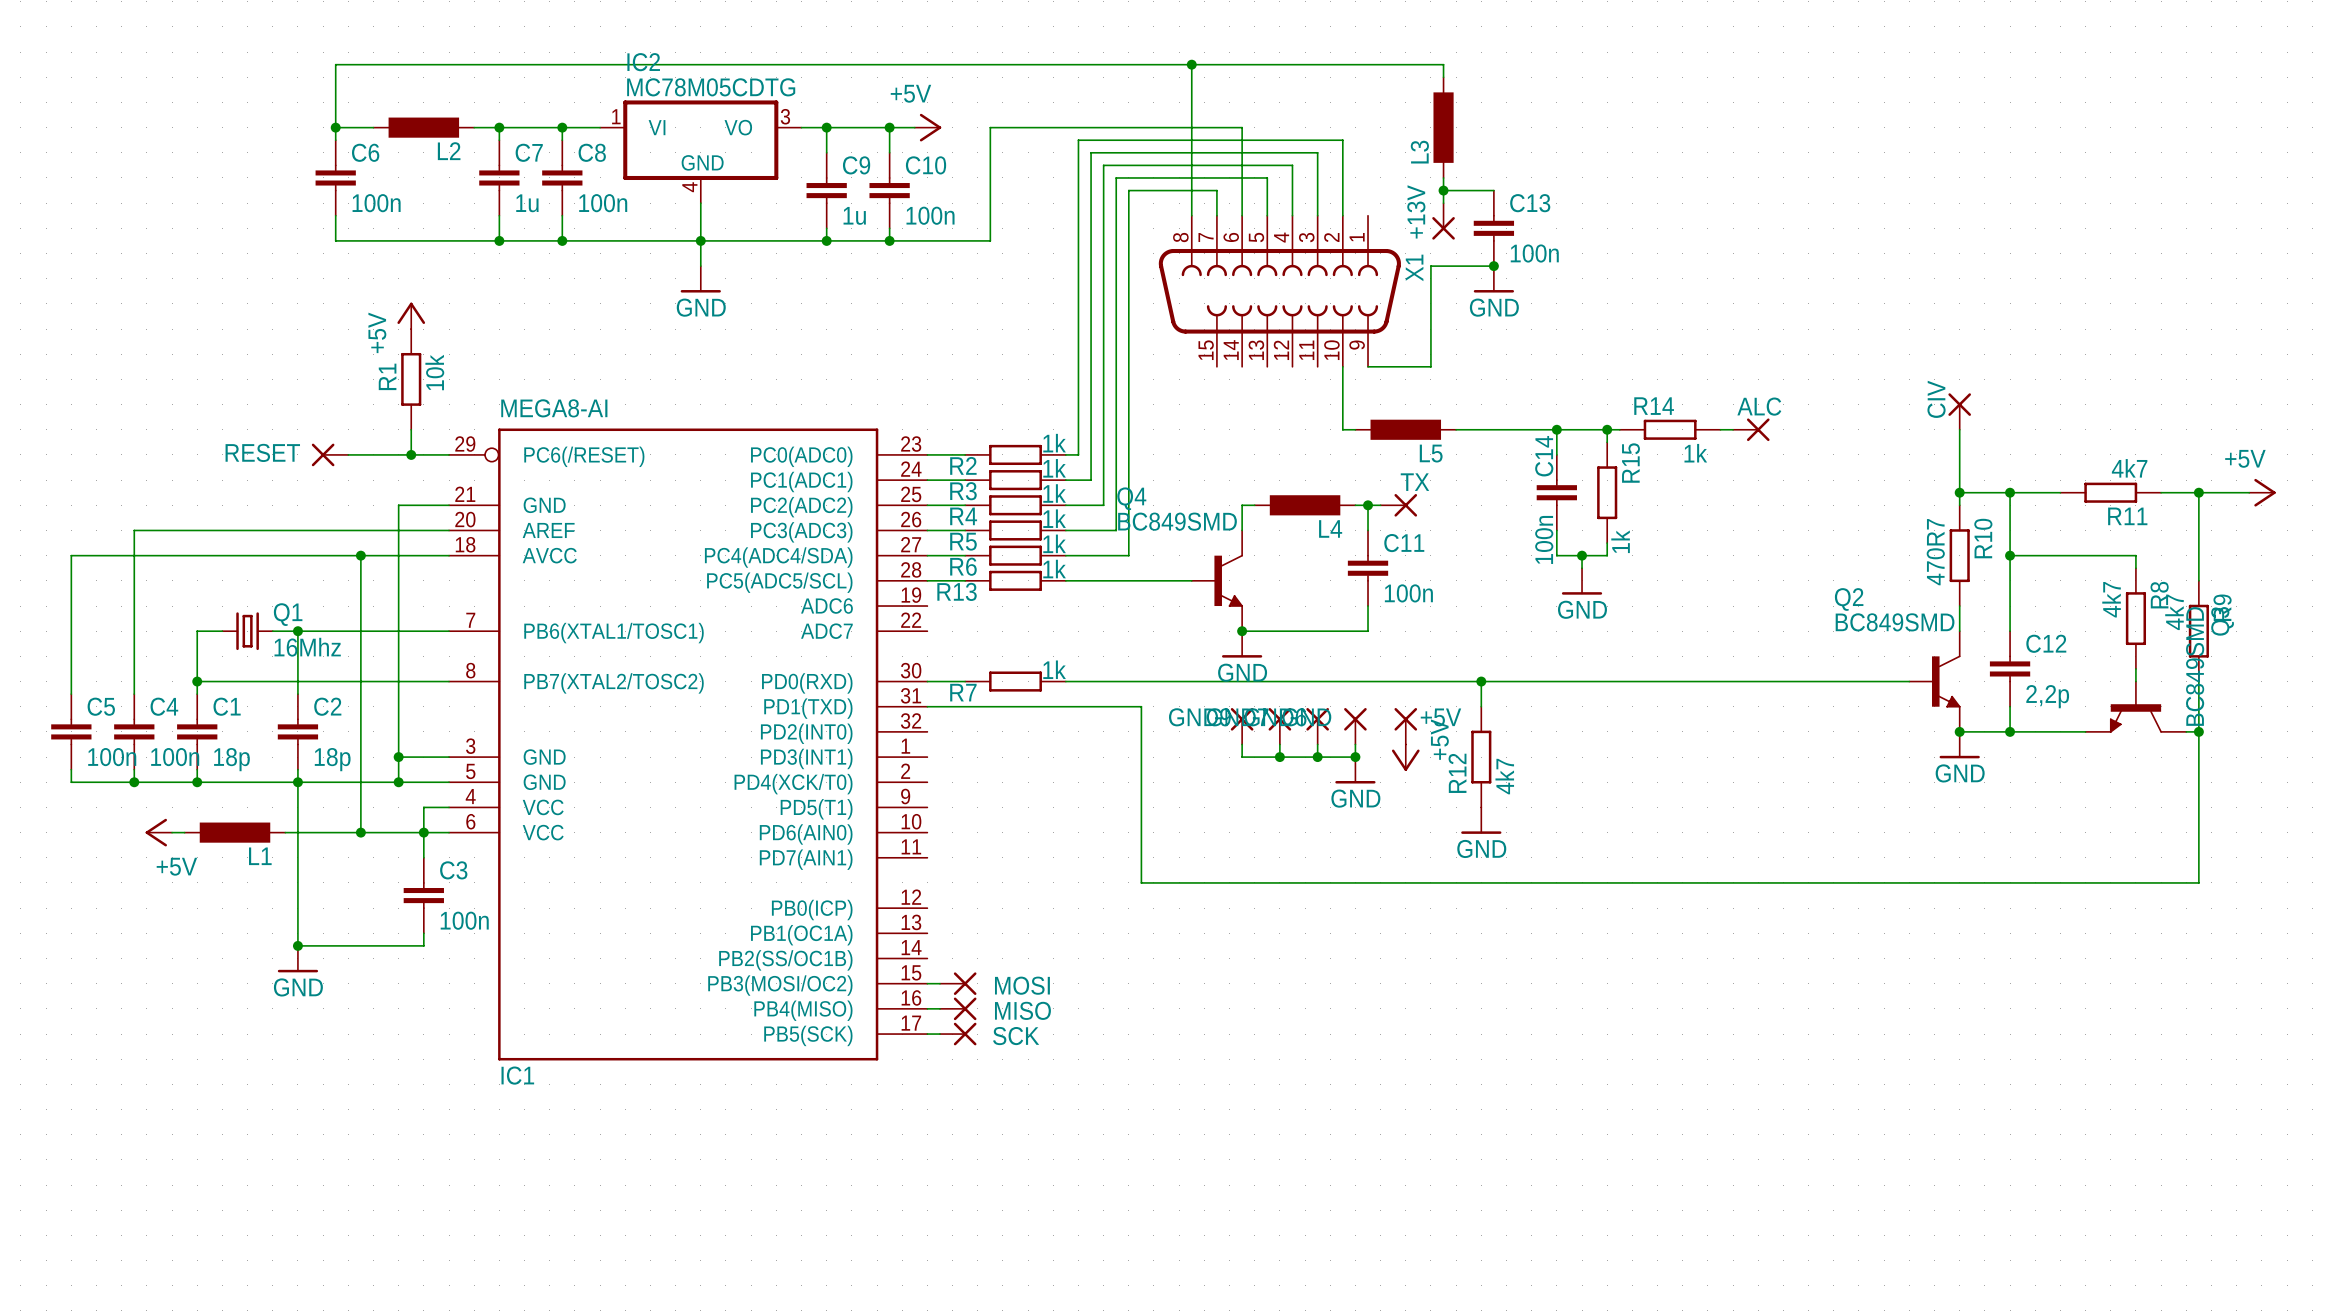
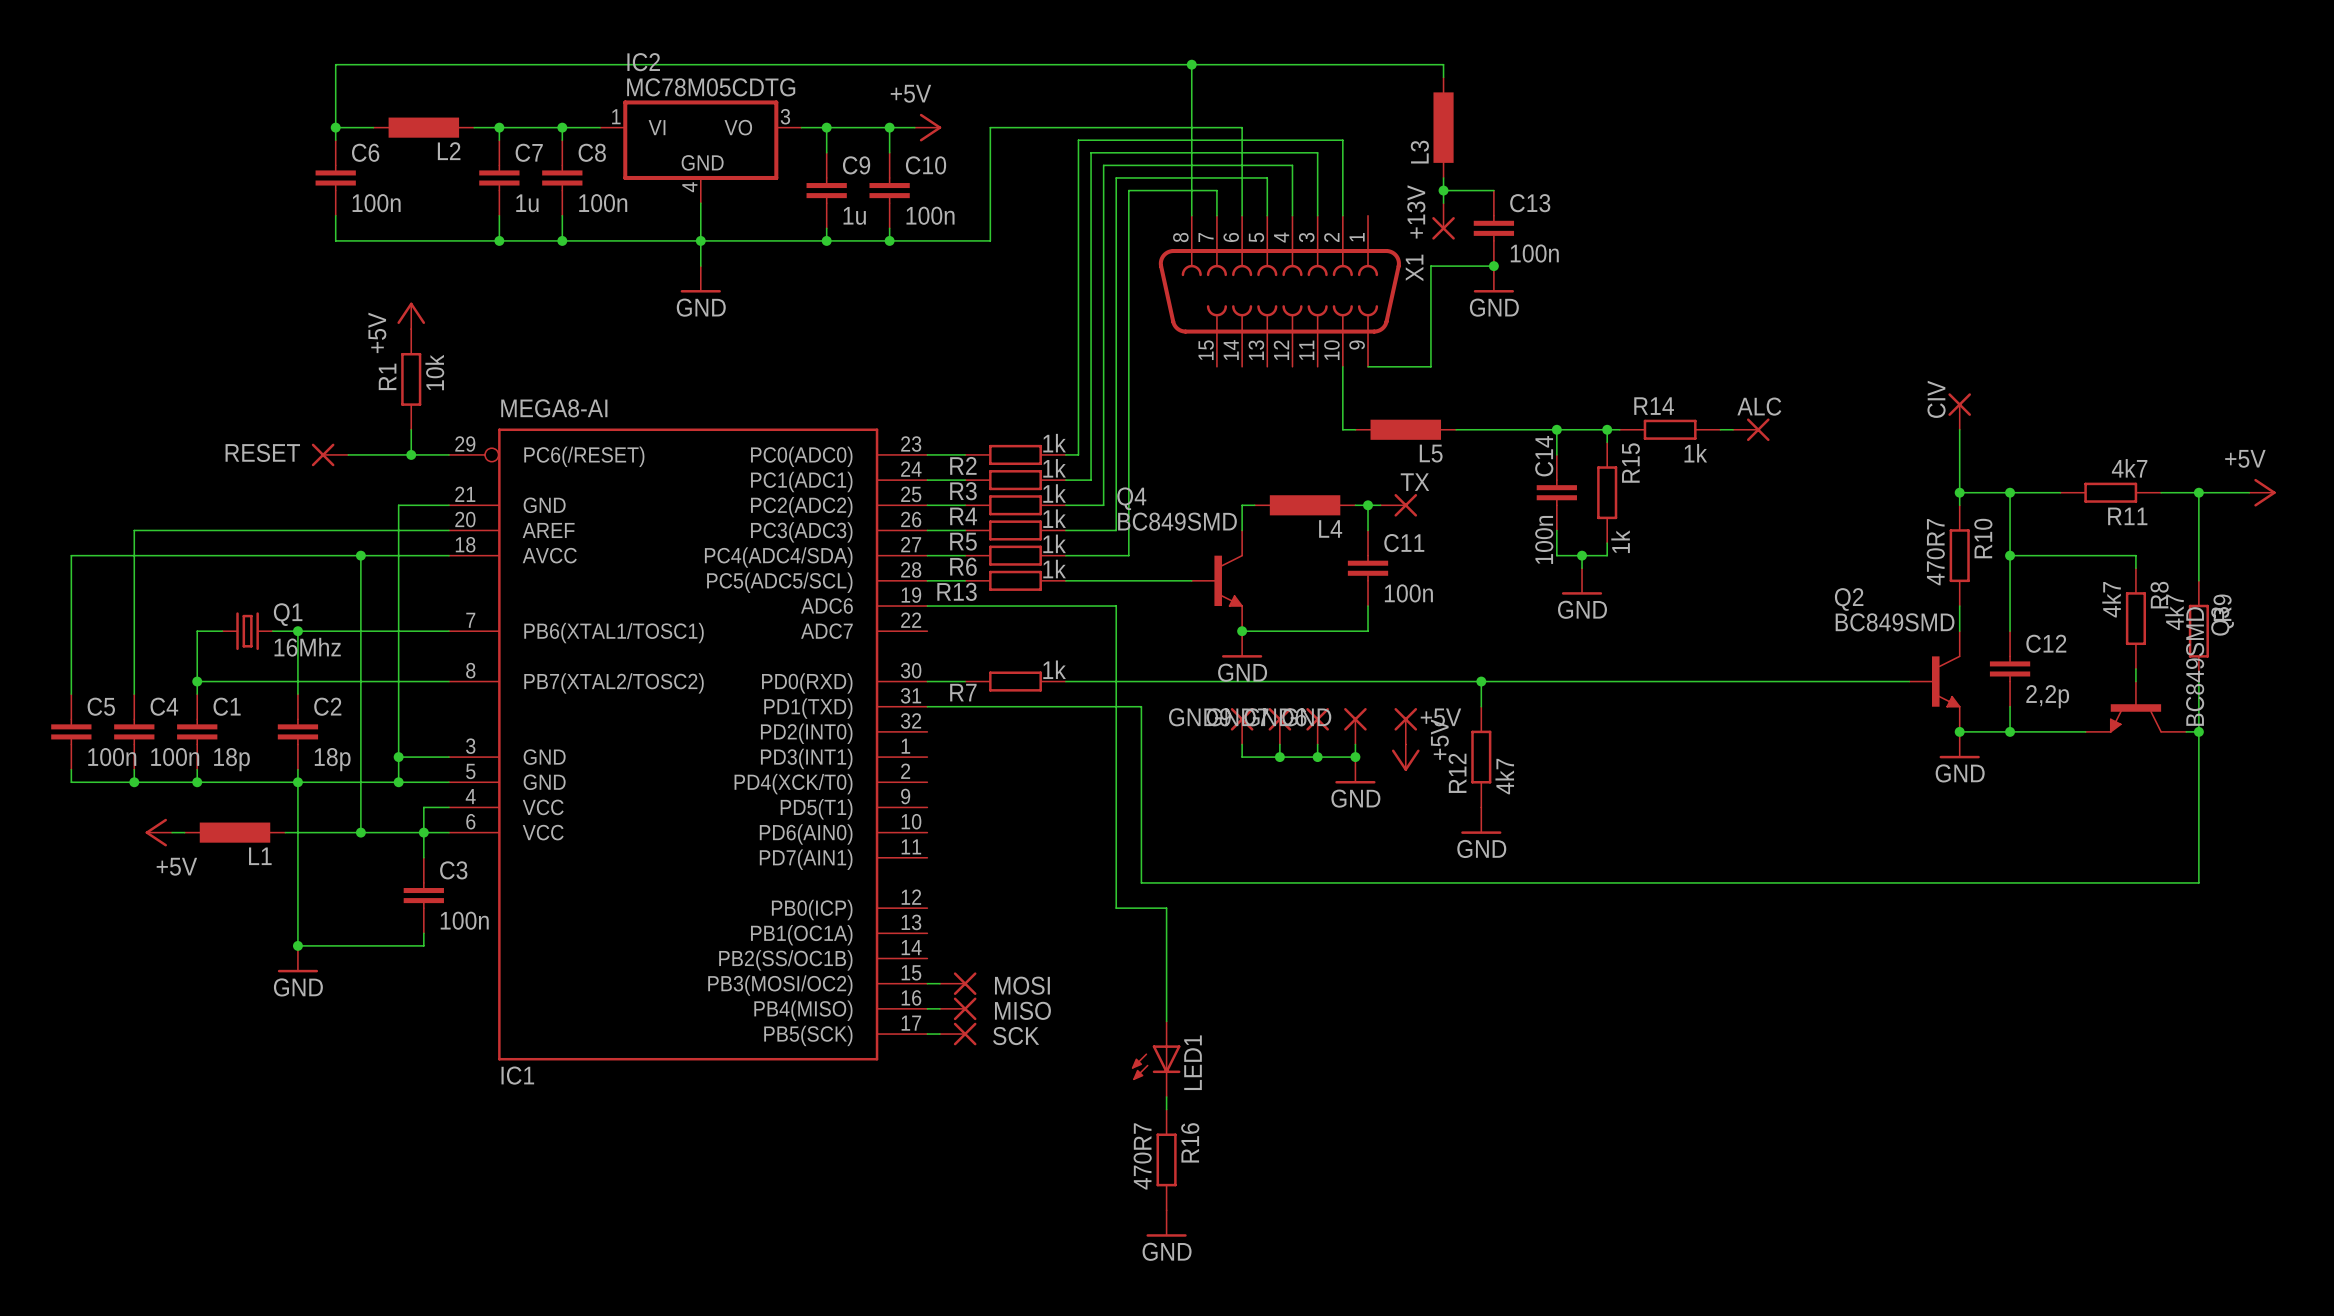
wire: none -> (927, 606) (1116, 606) (1116, 908) (1166, 908) (1166, 1021)
LED1: none -> (1156, 1059)
wire: none -> (1166, 1096) (1166, 1109)
R16: none -> 470R7 (1166, 1159)
power symbol: none -> GND (1166, 1223)

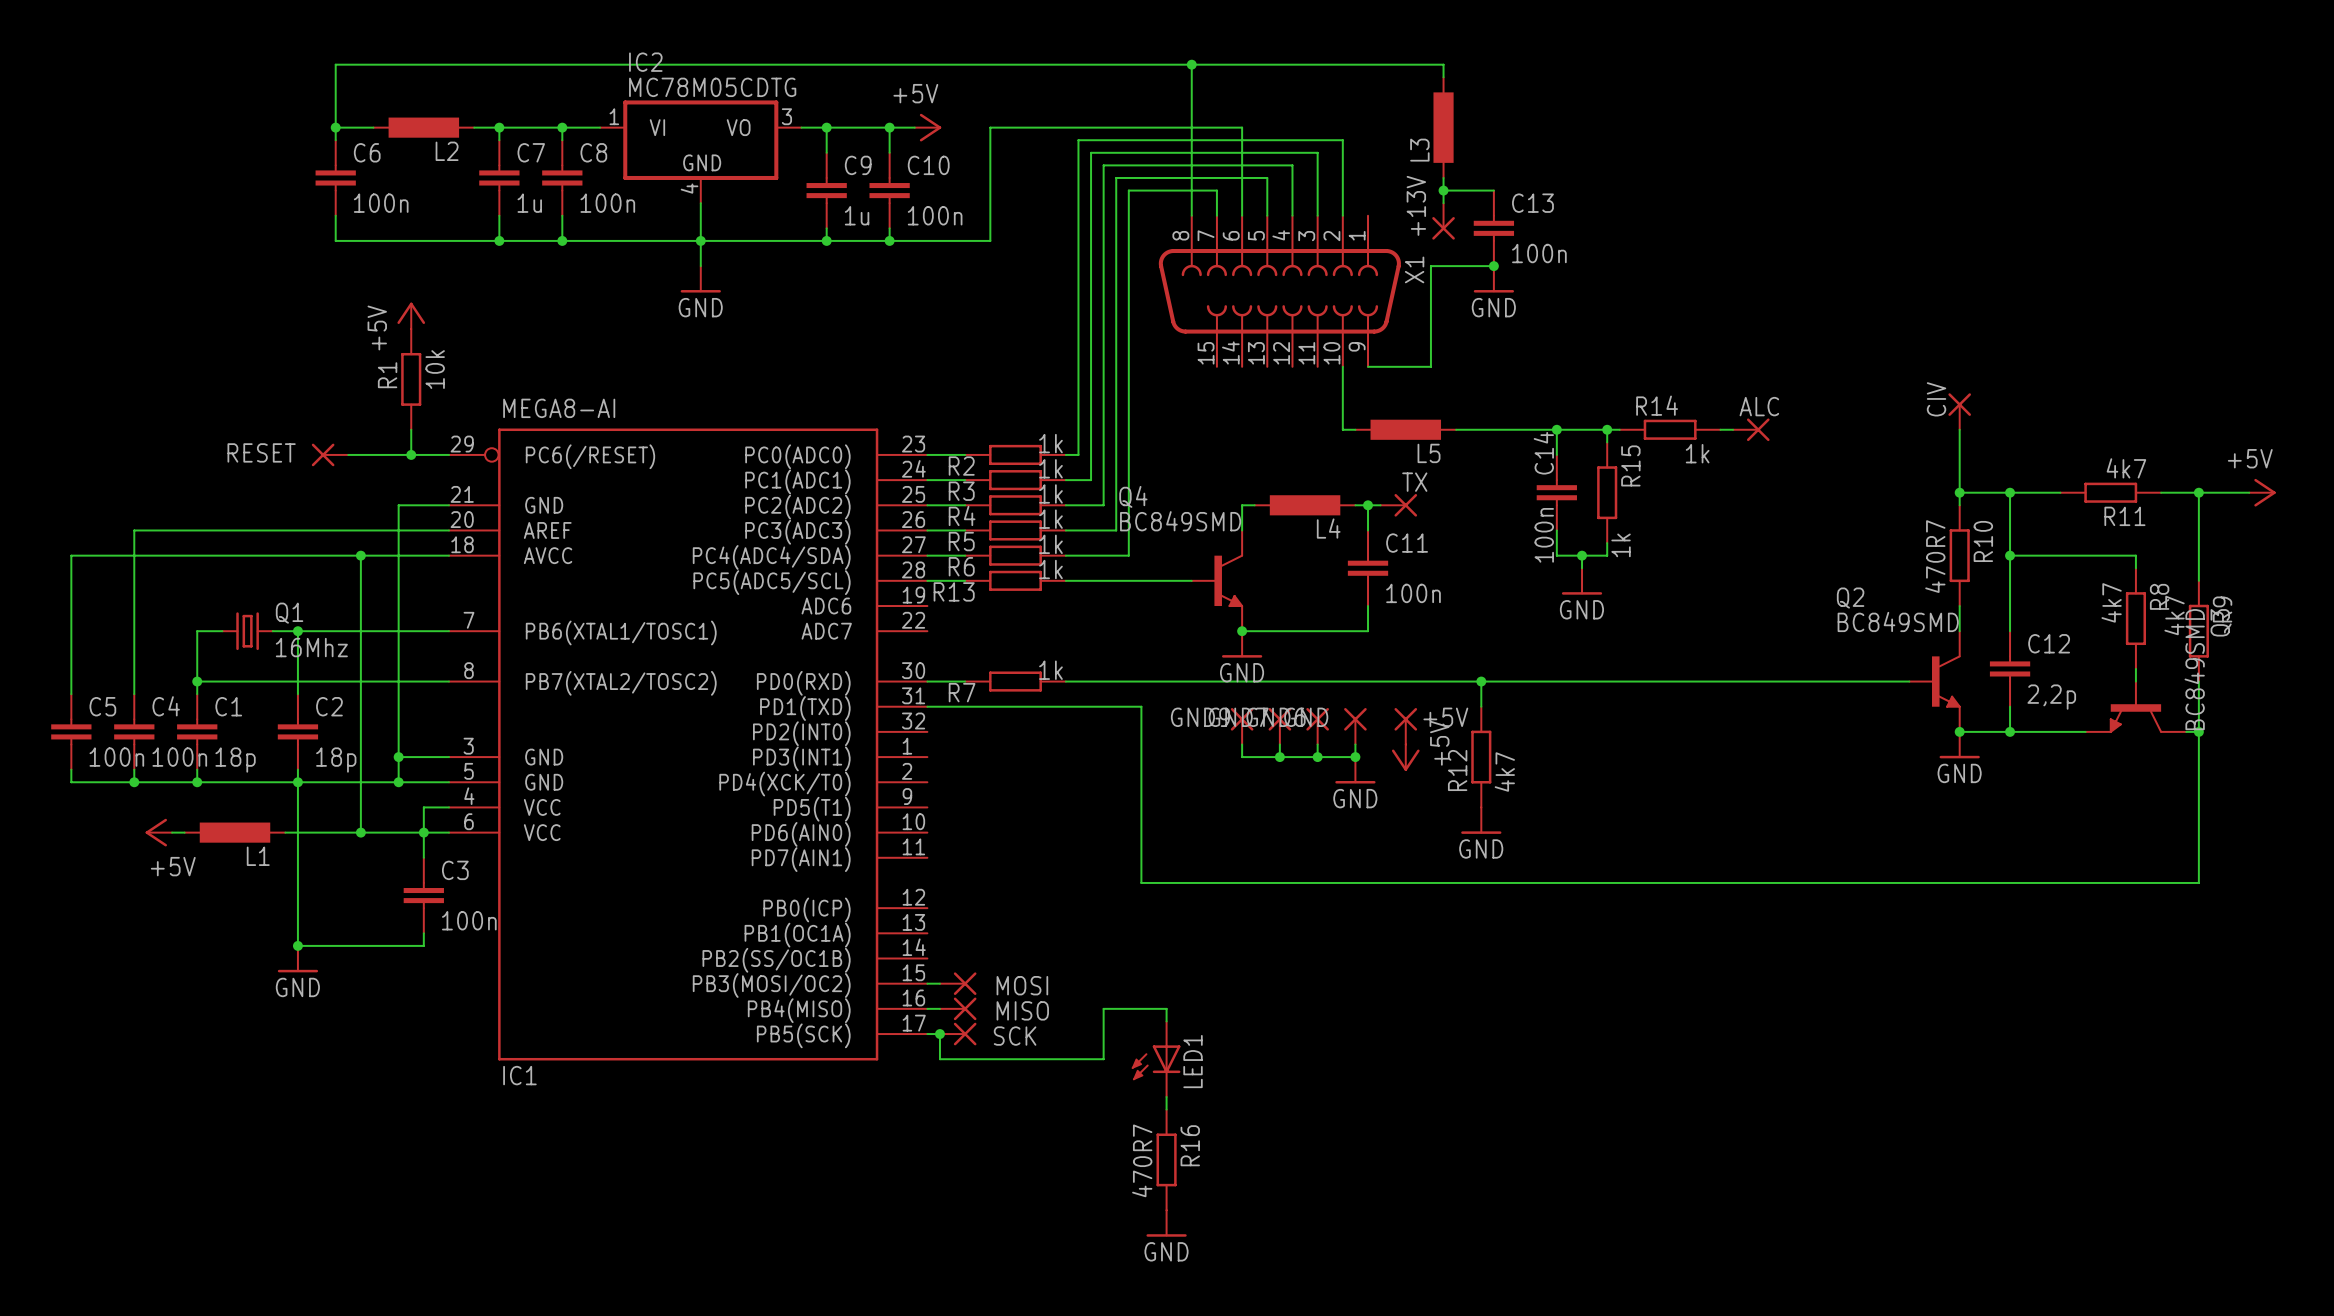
wire: (927, 606) (1116, 606) (1116, 908) (1166, 908) (1166, 1008) -> (939, 1034) (939, 1059) (1103, 1059) (1103, 1008) (1166, 1008)
junction: none -> (939, 1034)

